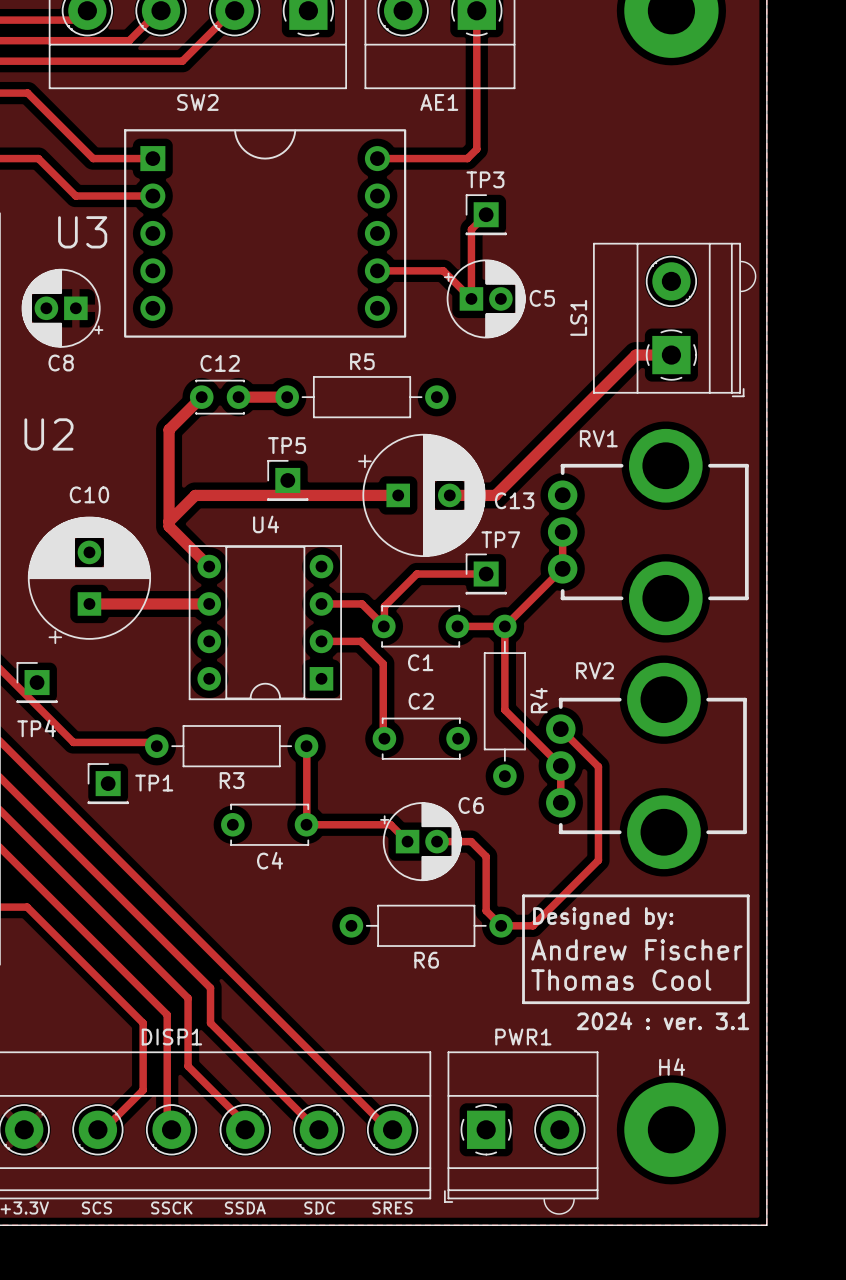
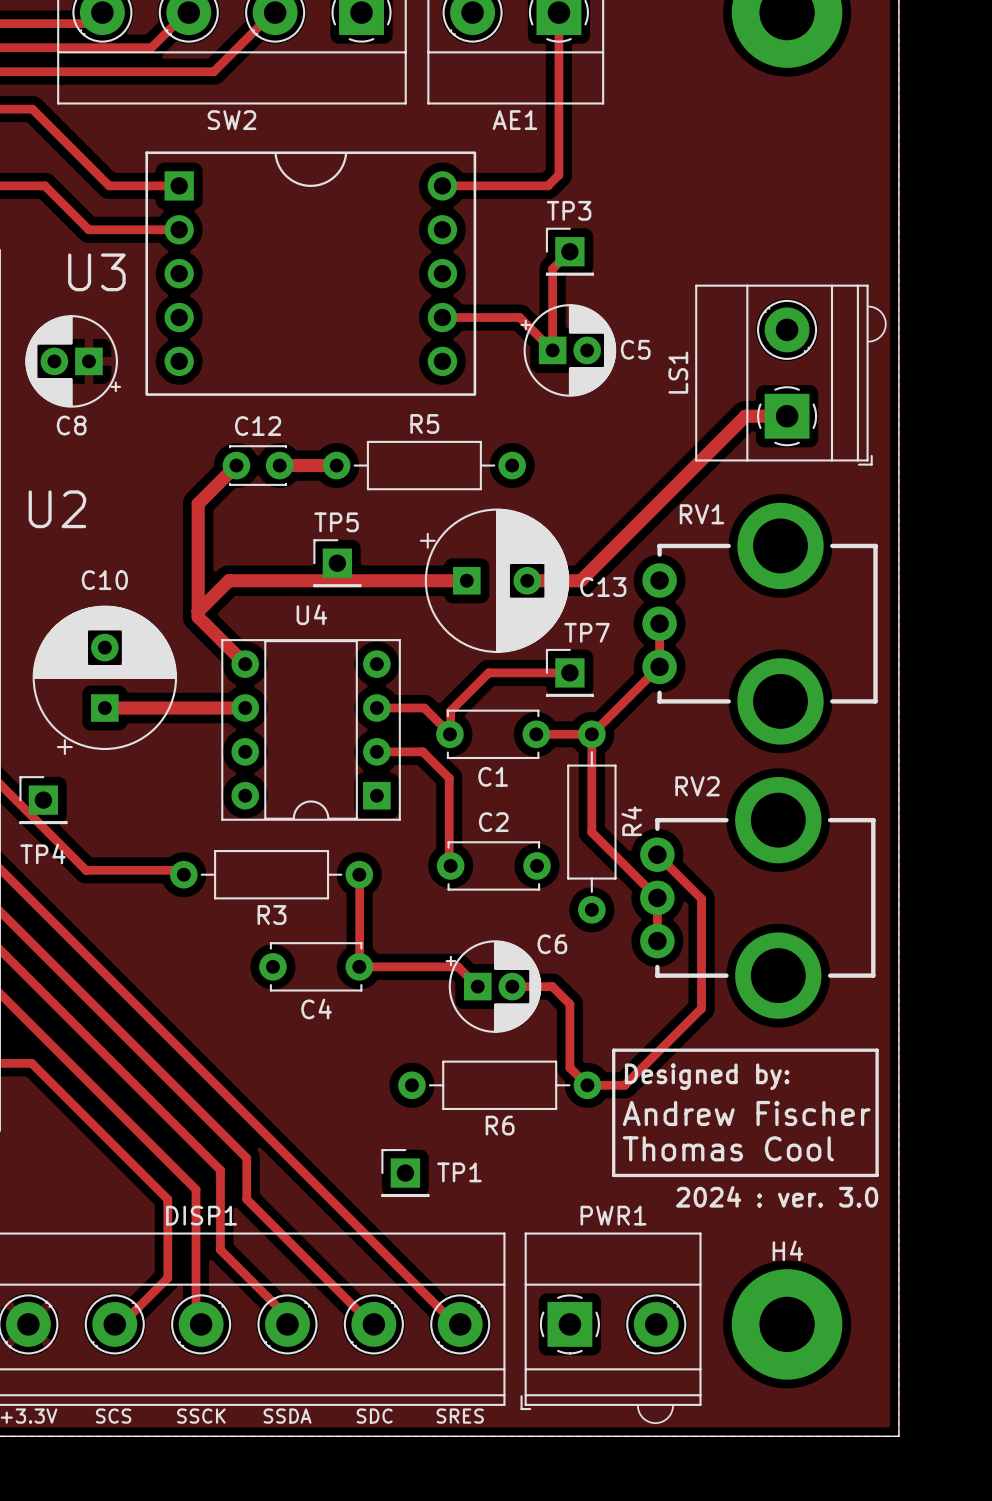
TP1 position: (108, 783) -> (405, 1173)
text: 2024 : ver. 3.1 (662, 1020) -> 2024 : ver. 3.0 (777, 1196)

